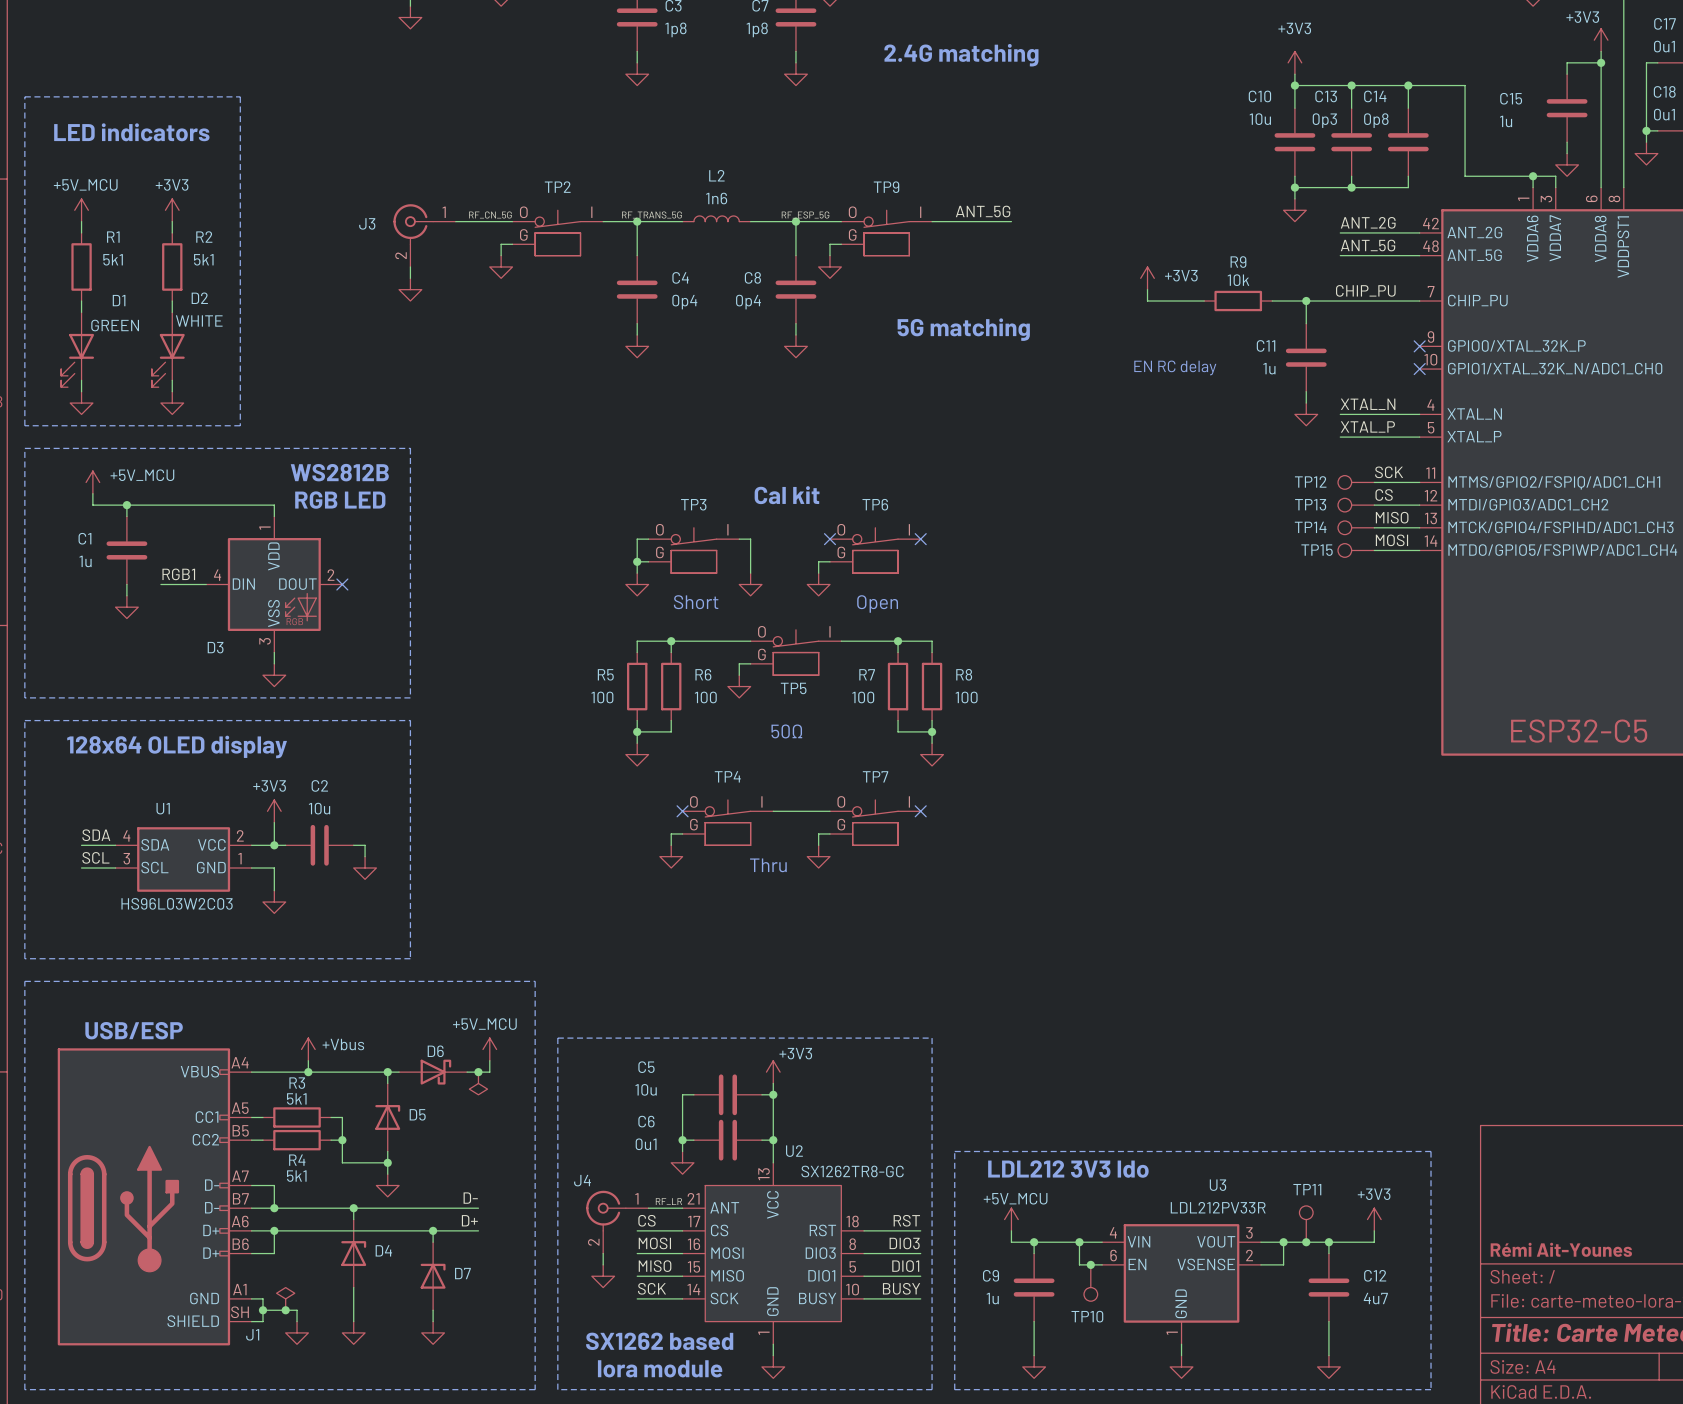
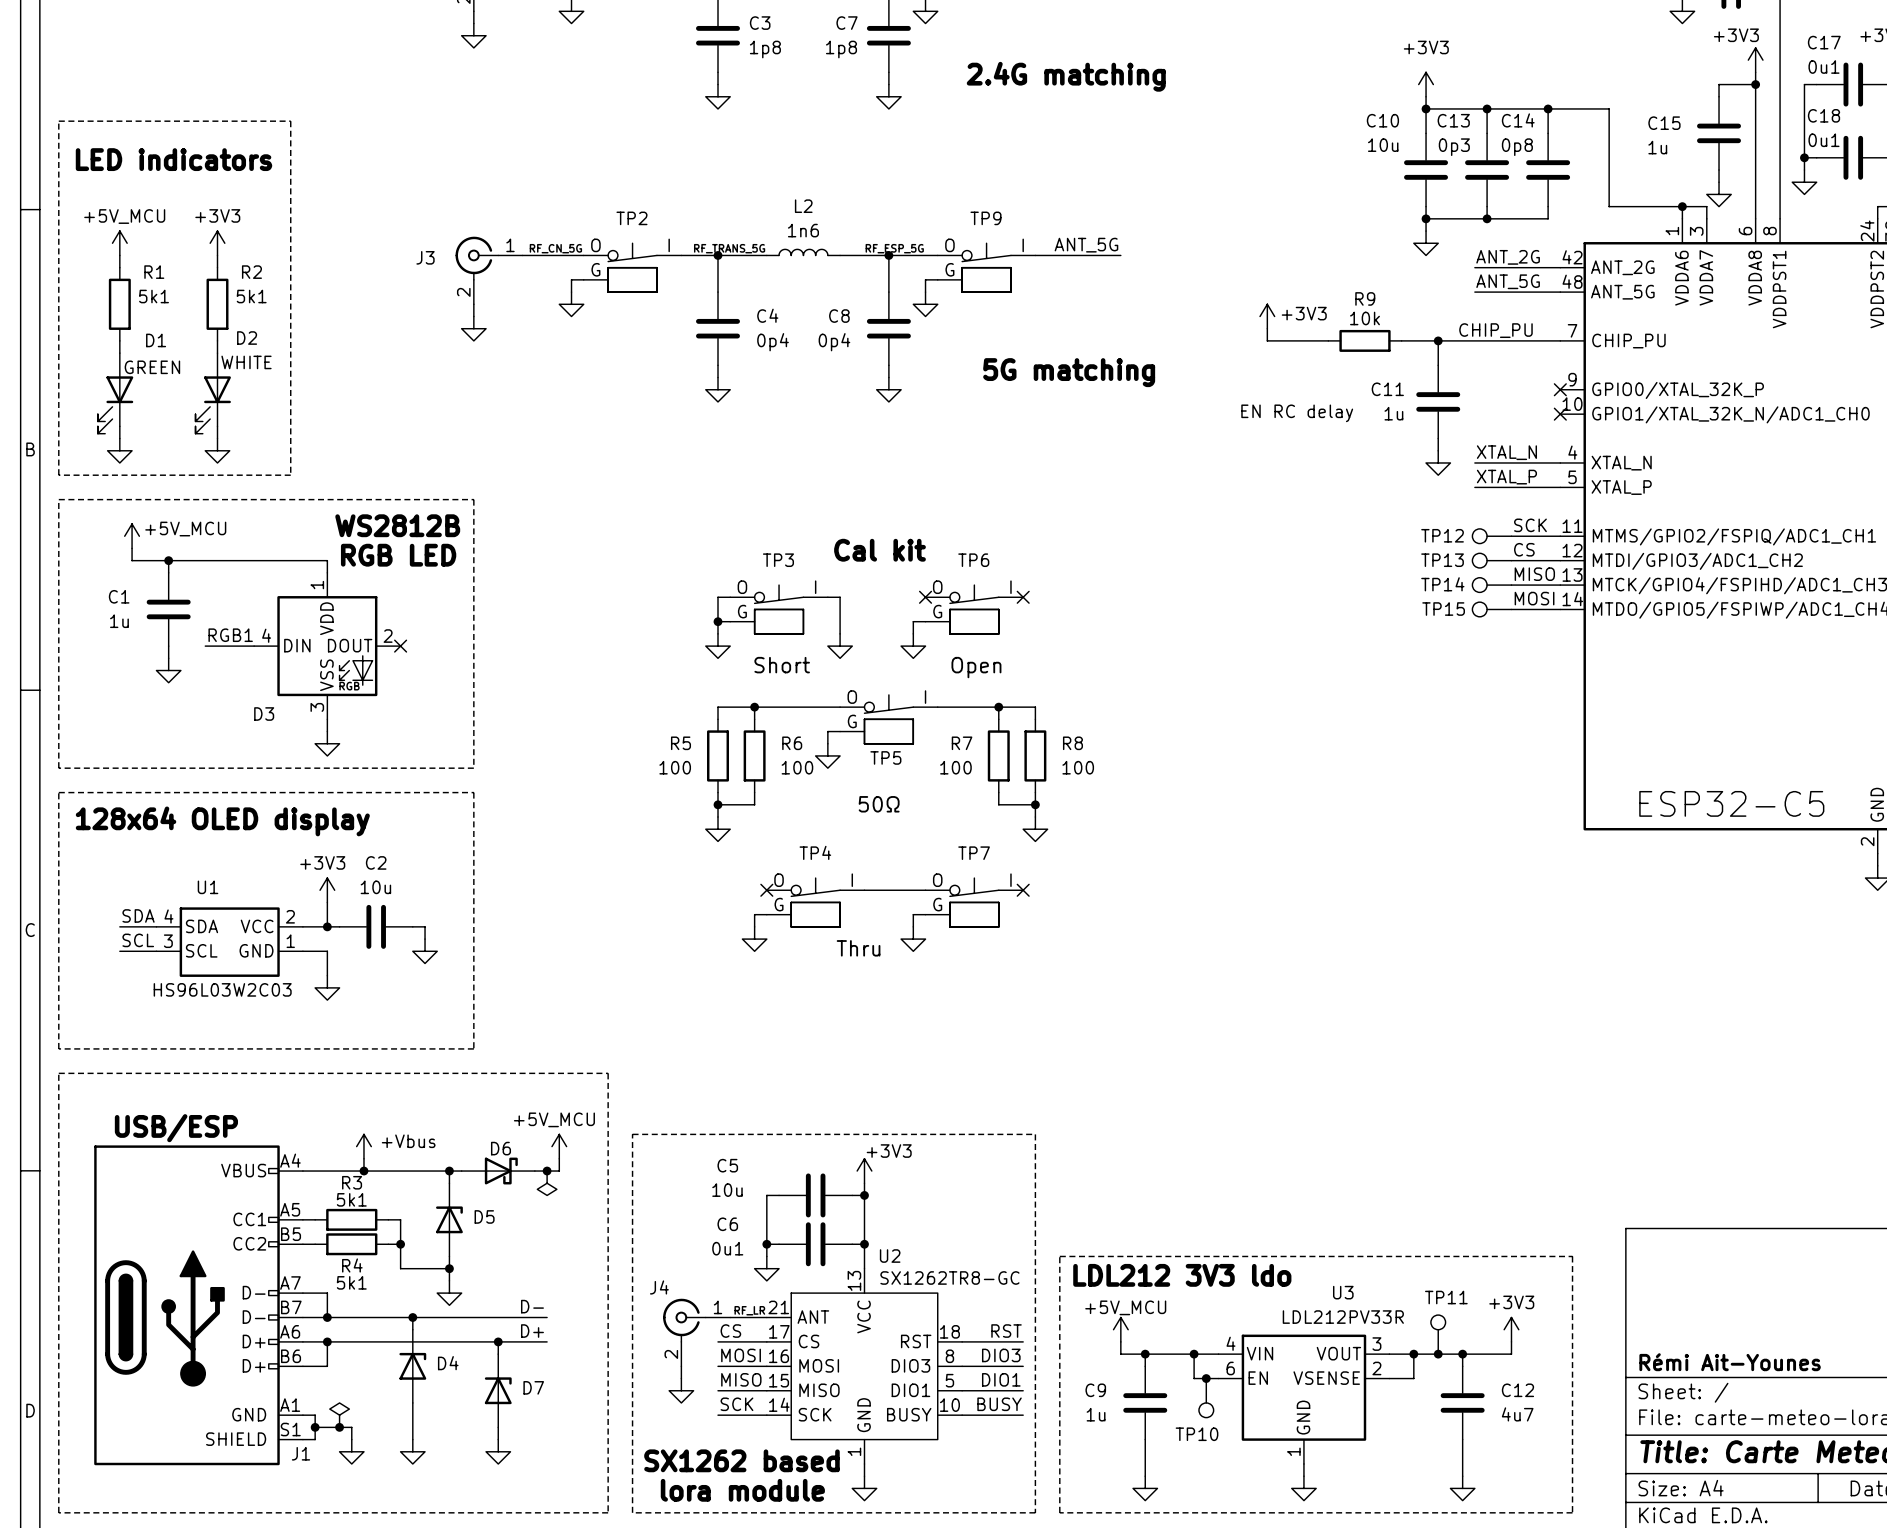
J1 pin number: SH (239, 1312) -> S1 (290, 1429)

